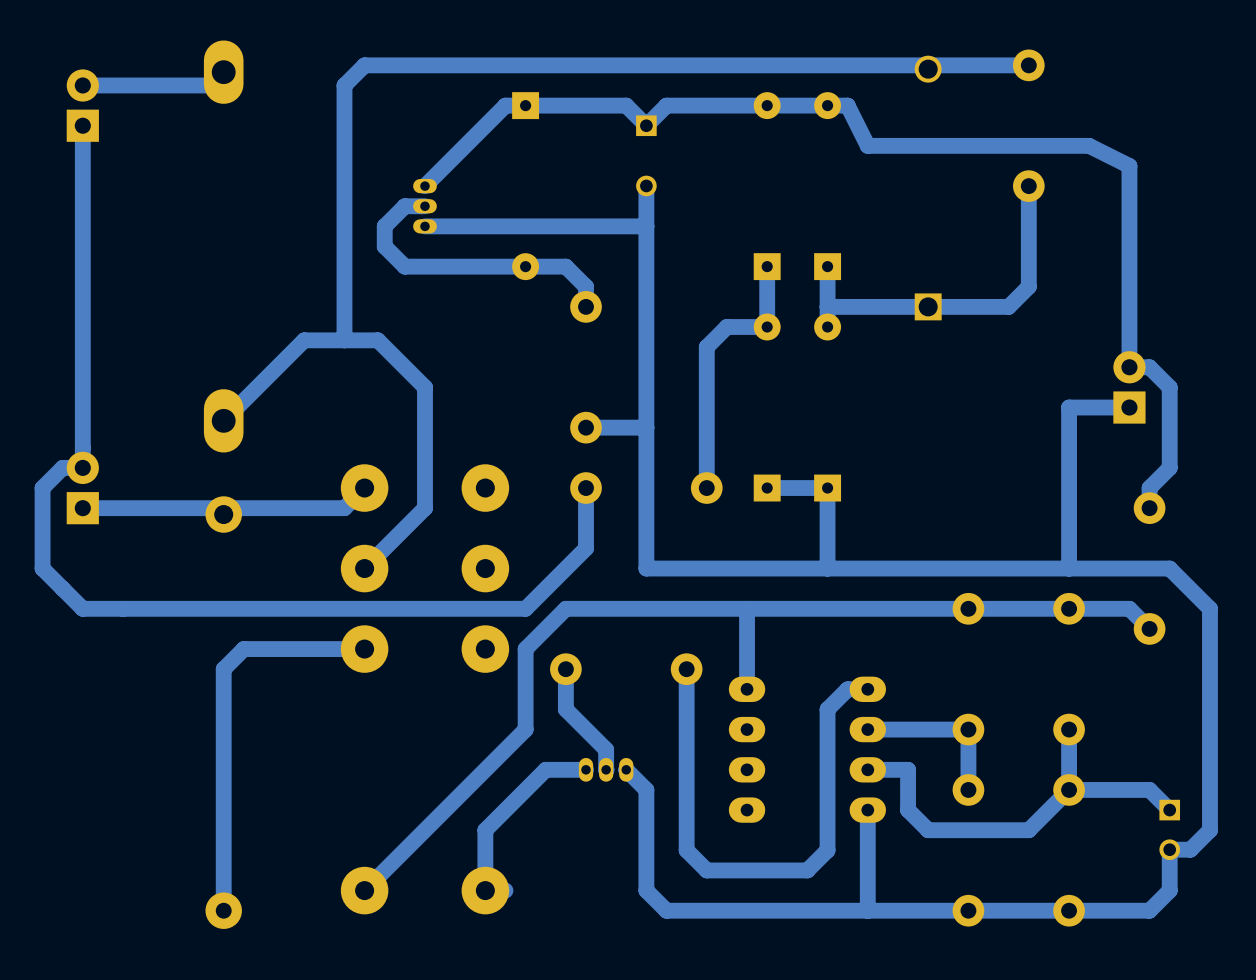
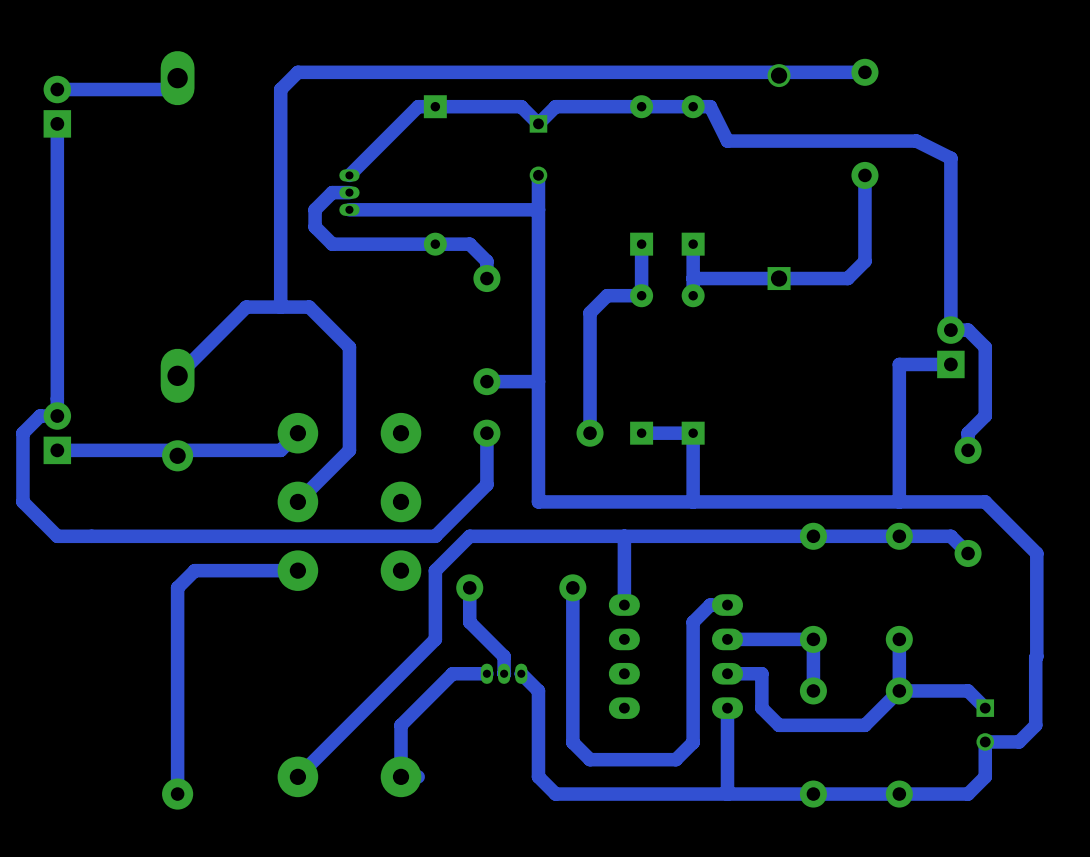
bottom track: (1209, 608) (1209, 830) (1190, 849) -> (1019, 536) (1036, 553) (1035, 725) (1019, 741) (1002, 741)

